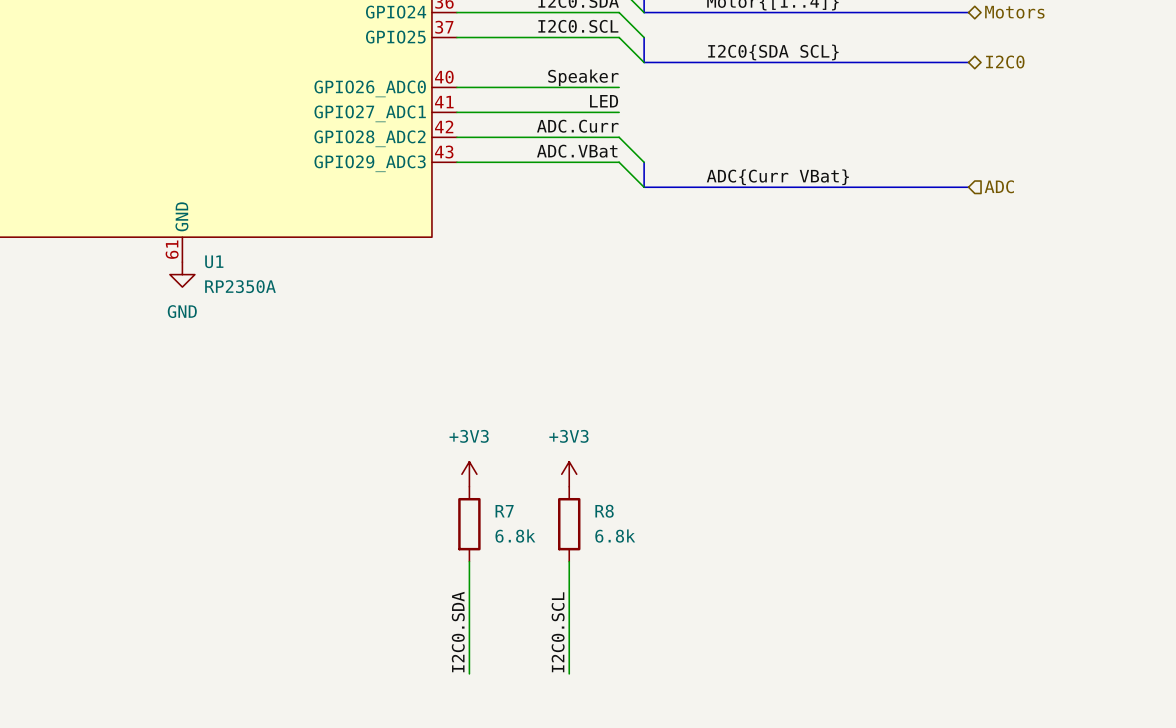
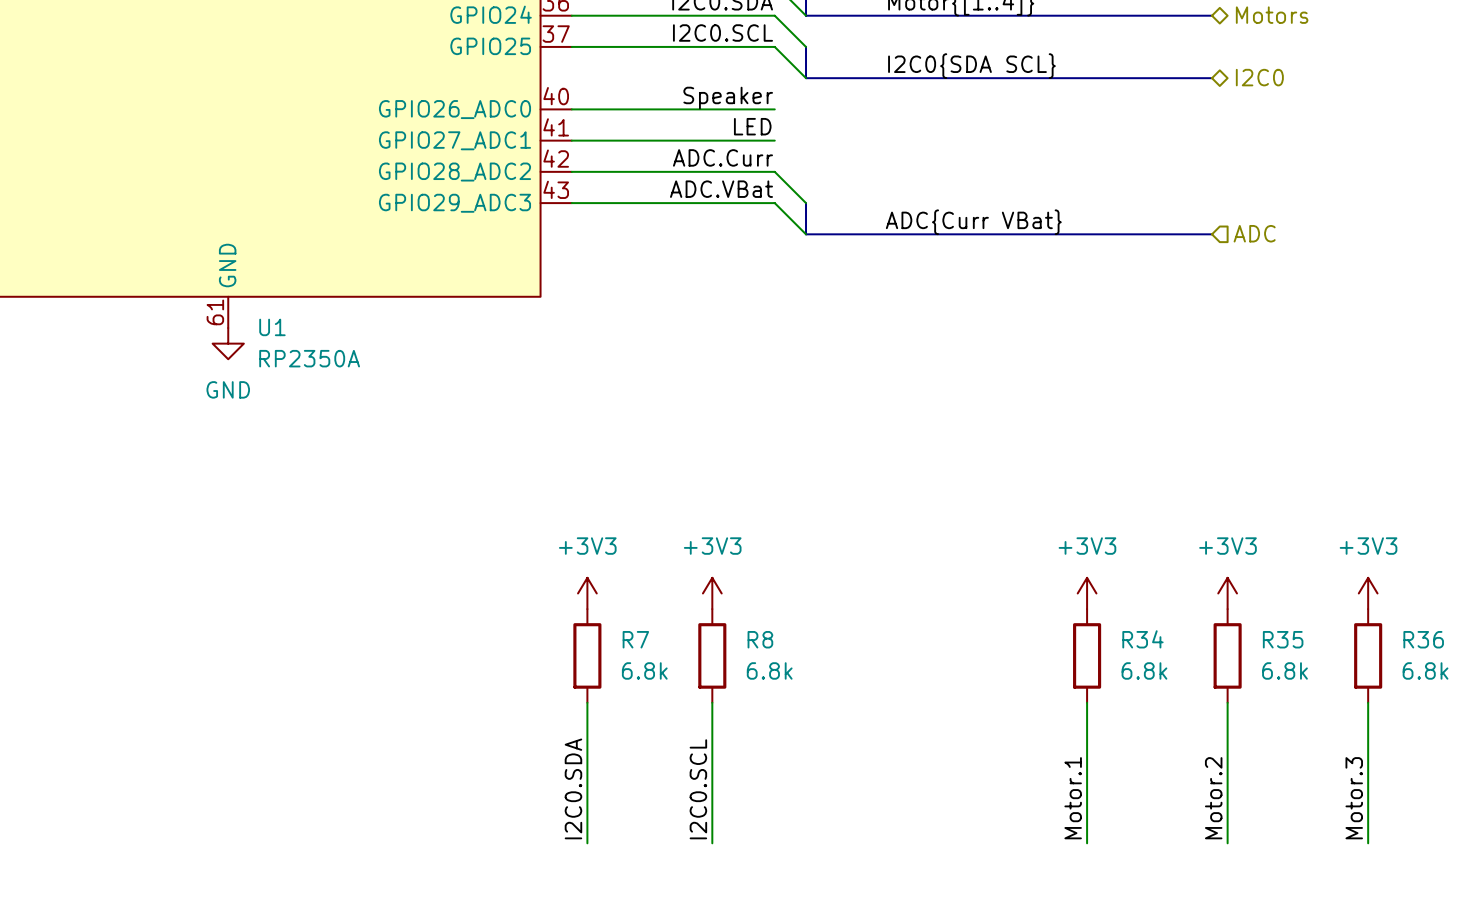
power symbol: none -> +3V3 (1087, 593)
power symbol: none -> +3V3 (1227, 593)
power symbol: none -> +3V3 (1368, 593)
R34: none -> 6.8k (1087, 655)
R35: none -> 6.8k (1227, 655)
R36: none -> 6.8k (1368, 655)
wire: none -> (1087, 702) (1087, 843)
wire: none -> (1227, 702) (1227, 843)
wire: none -> (1368, 702) (1368, 843)
label: none -> Motor.1 (1073, 798)
label: none -> Motor.2 (1213, 798)
label: none -> Motor.3 (1354, 798)

